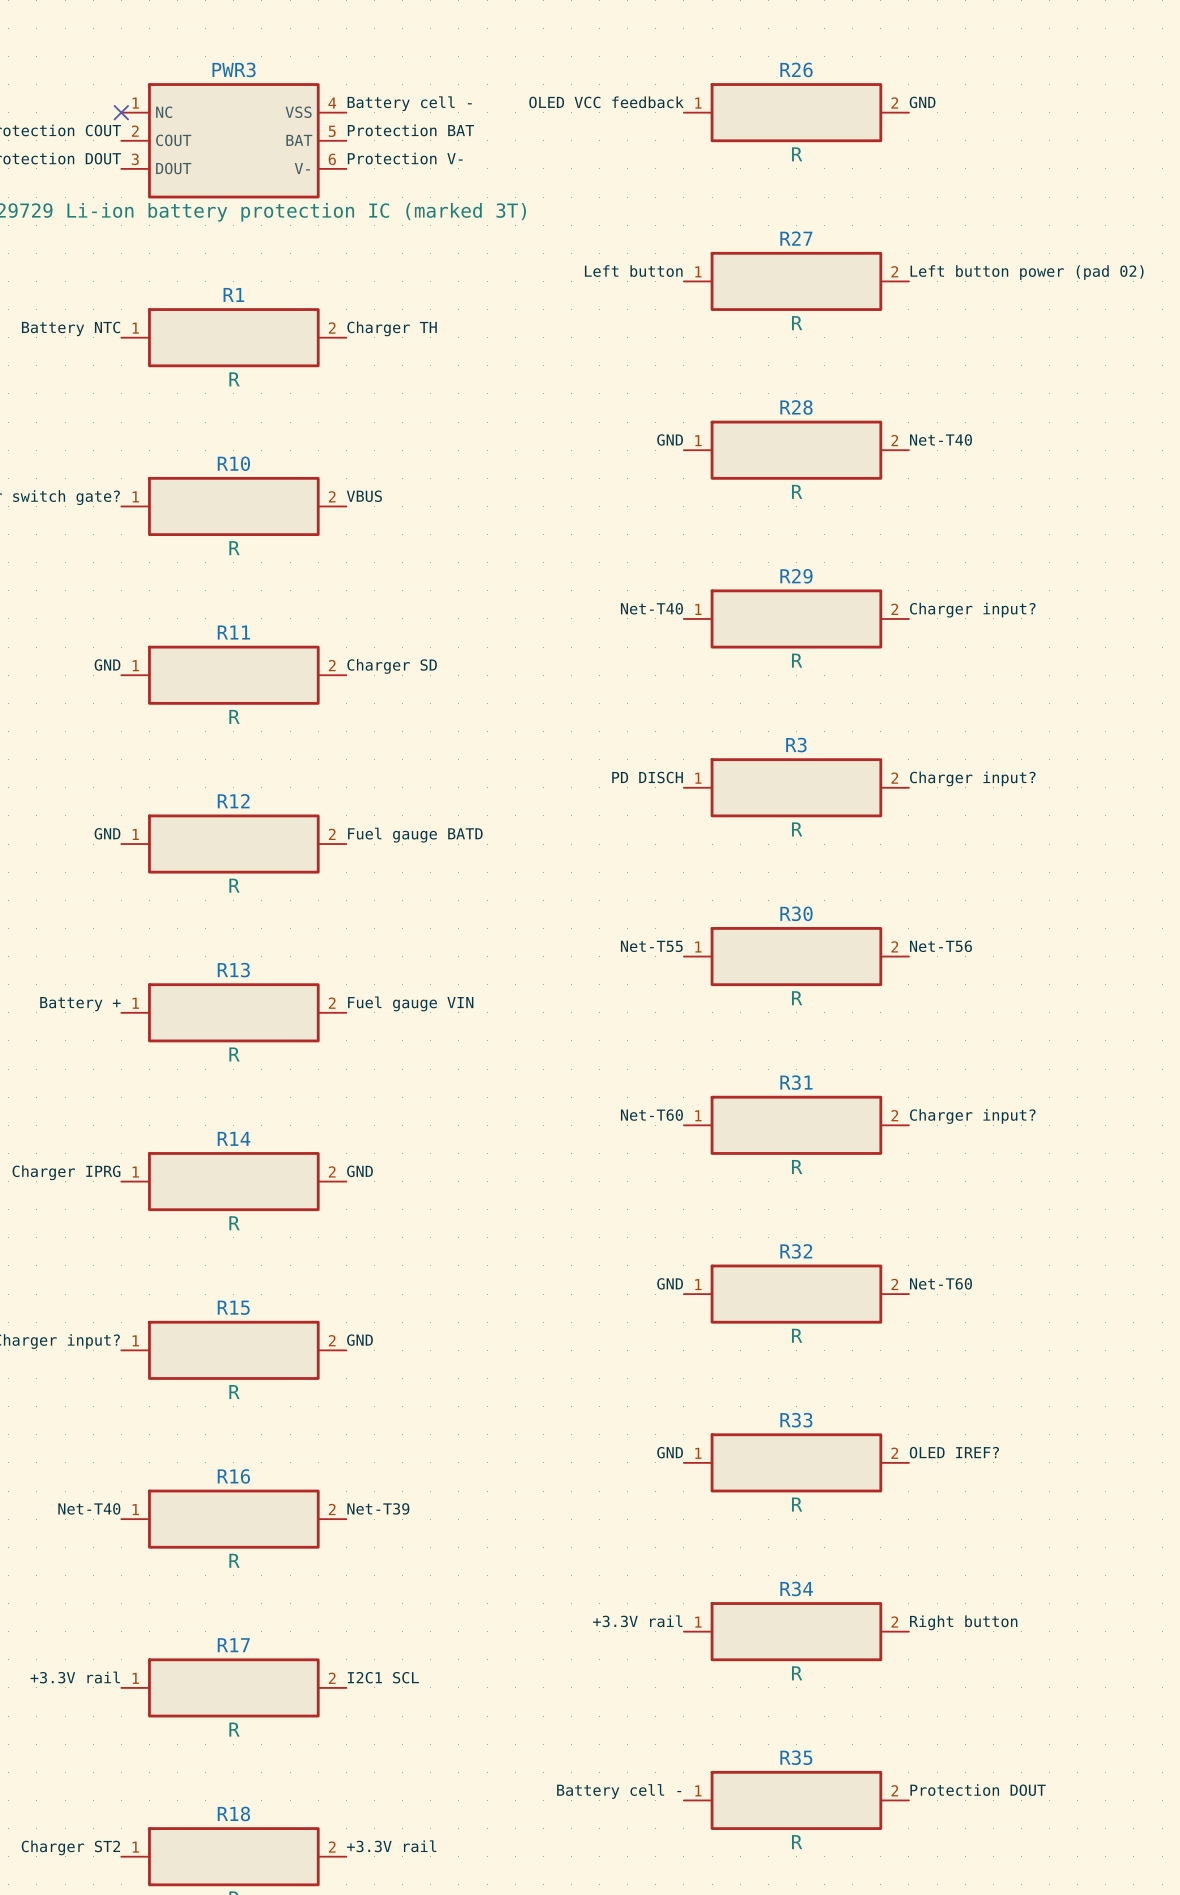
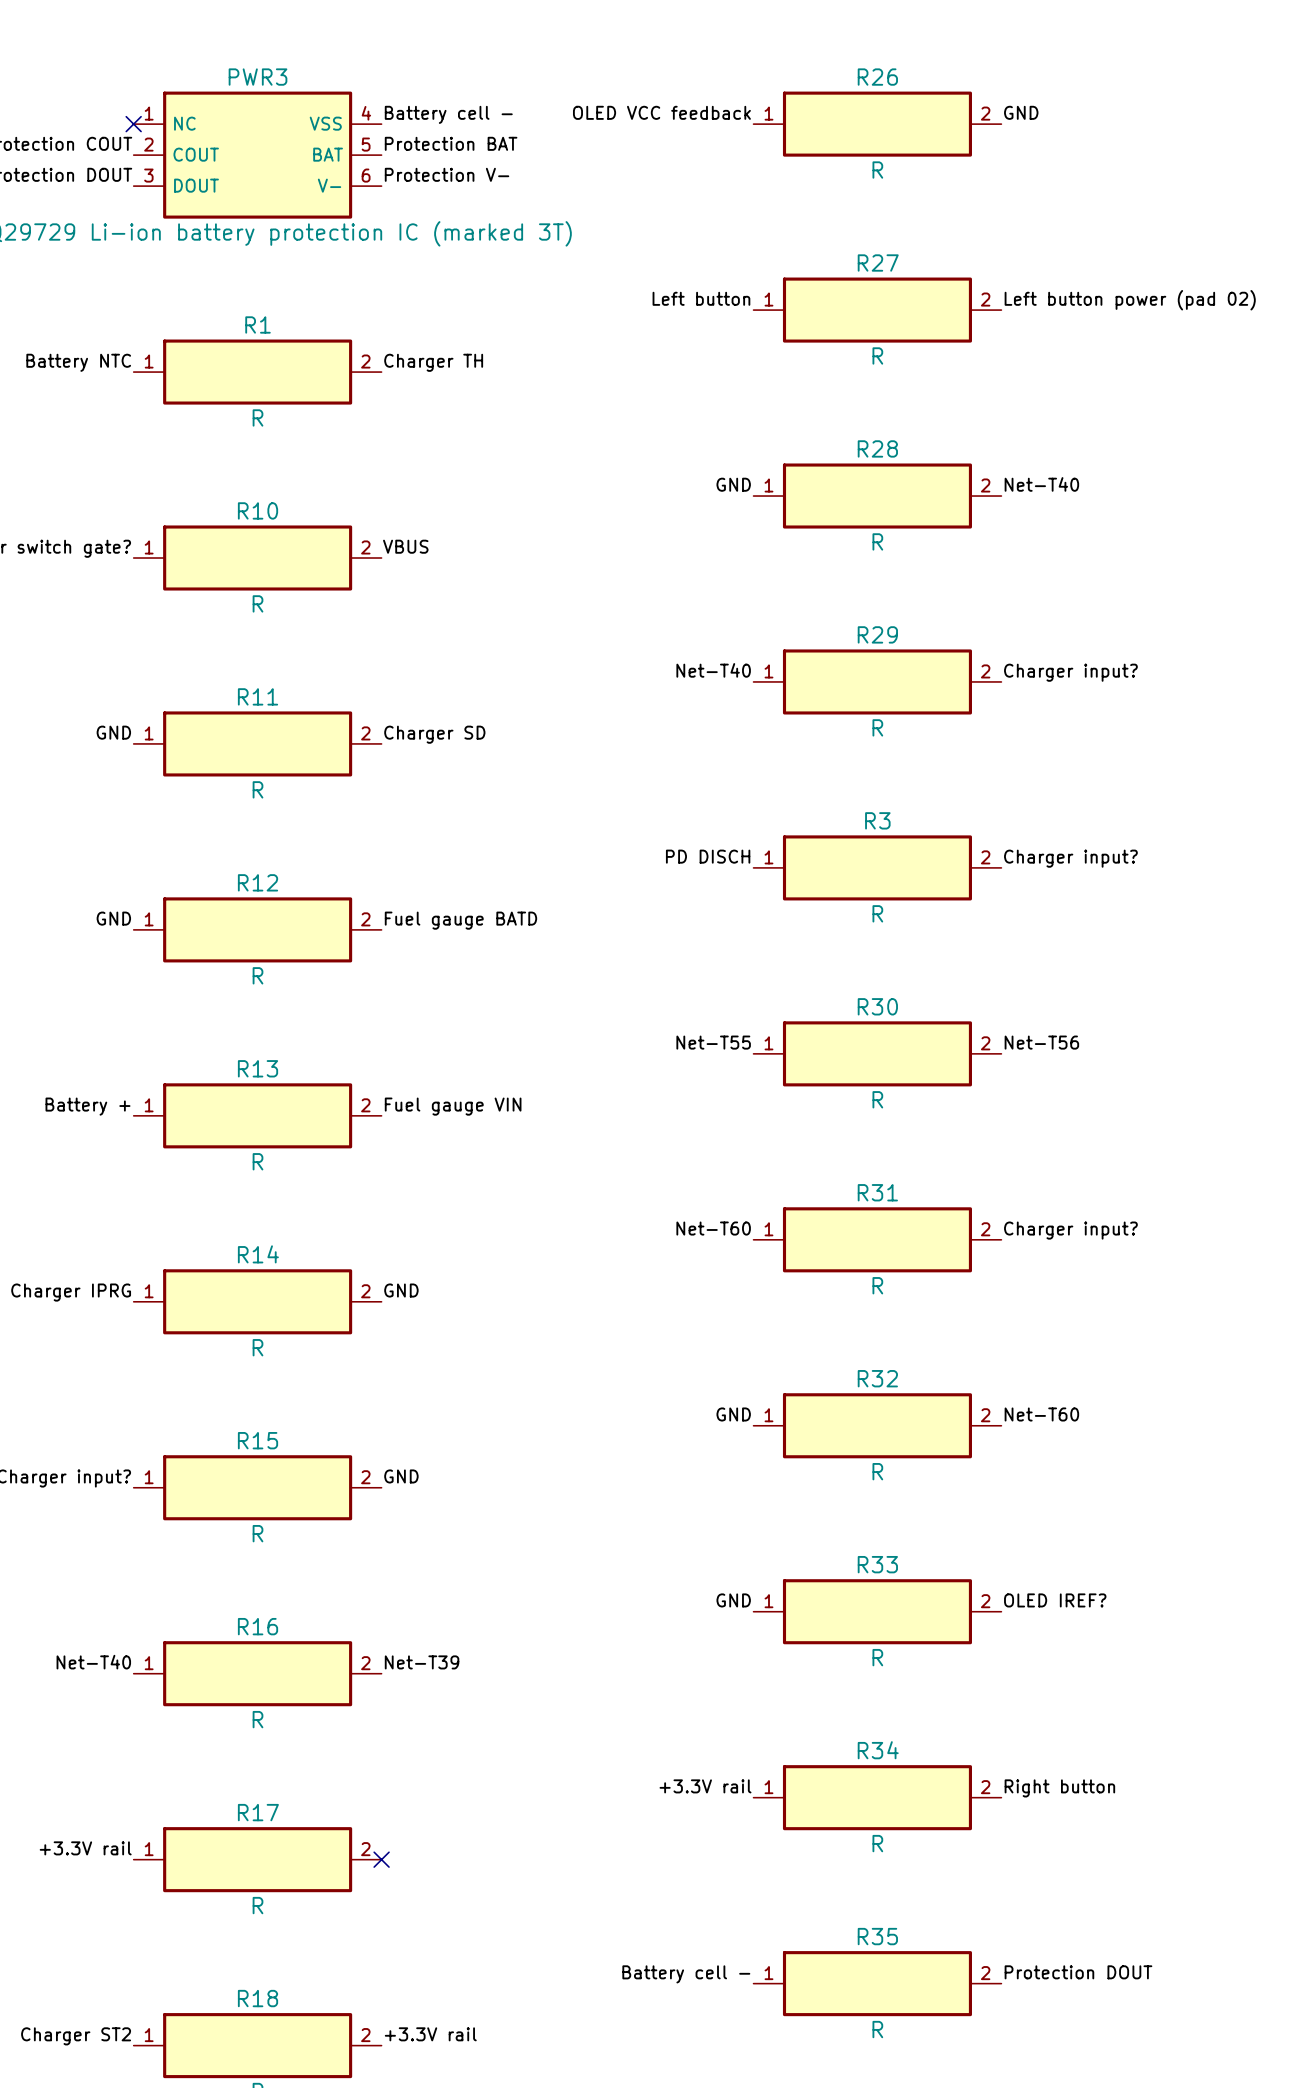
label: I2C1 SCL (383, 1677) -> none
no-connect mark: none -> (381, 1859)

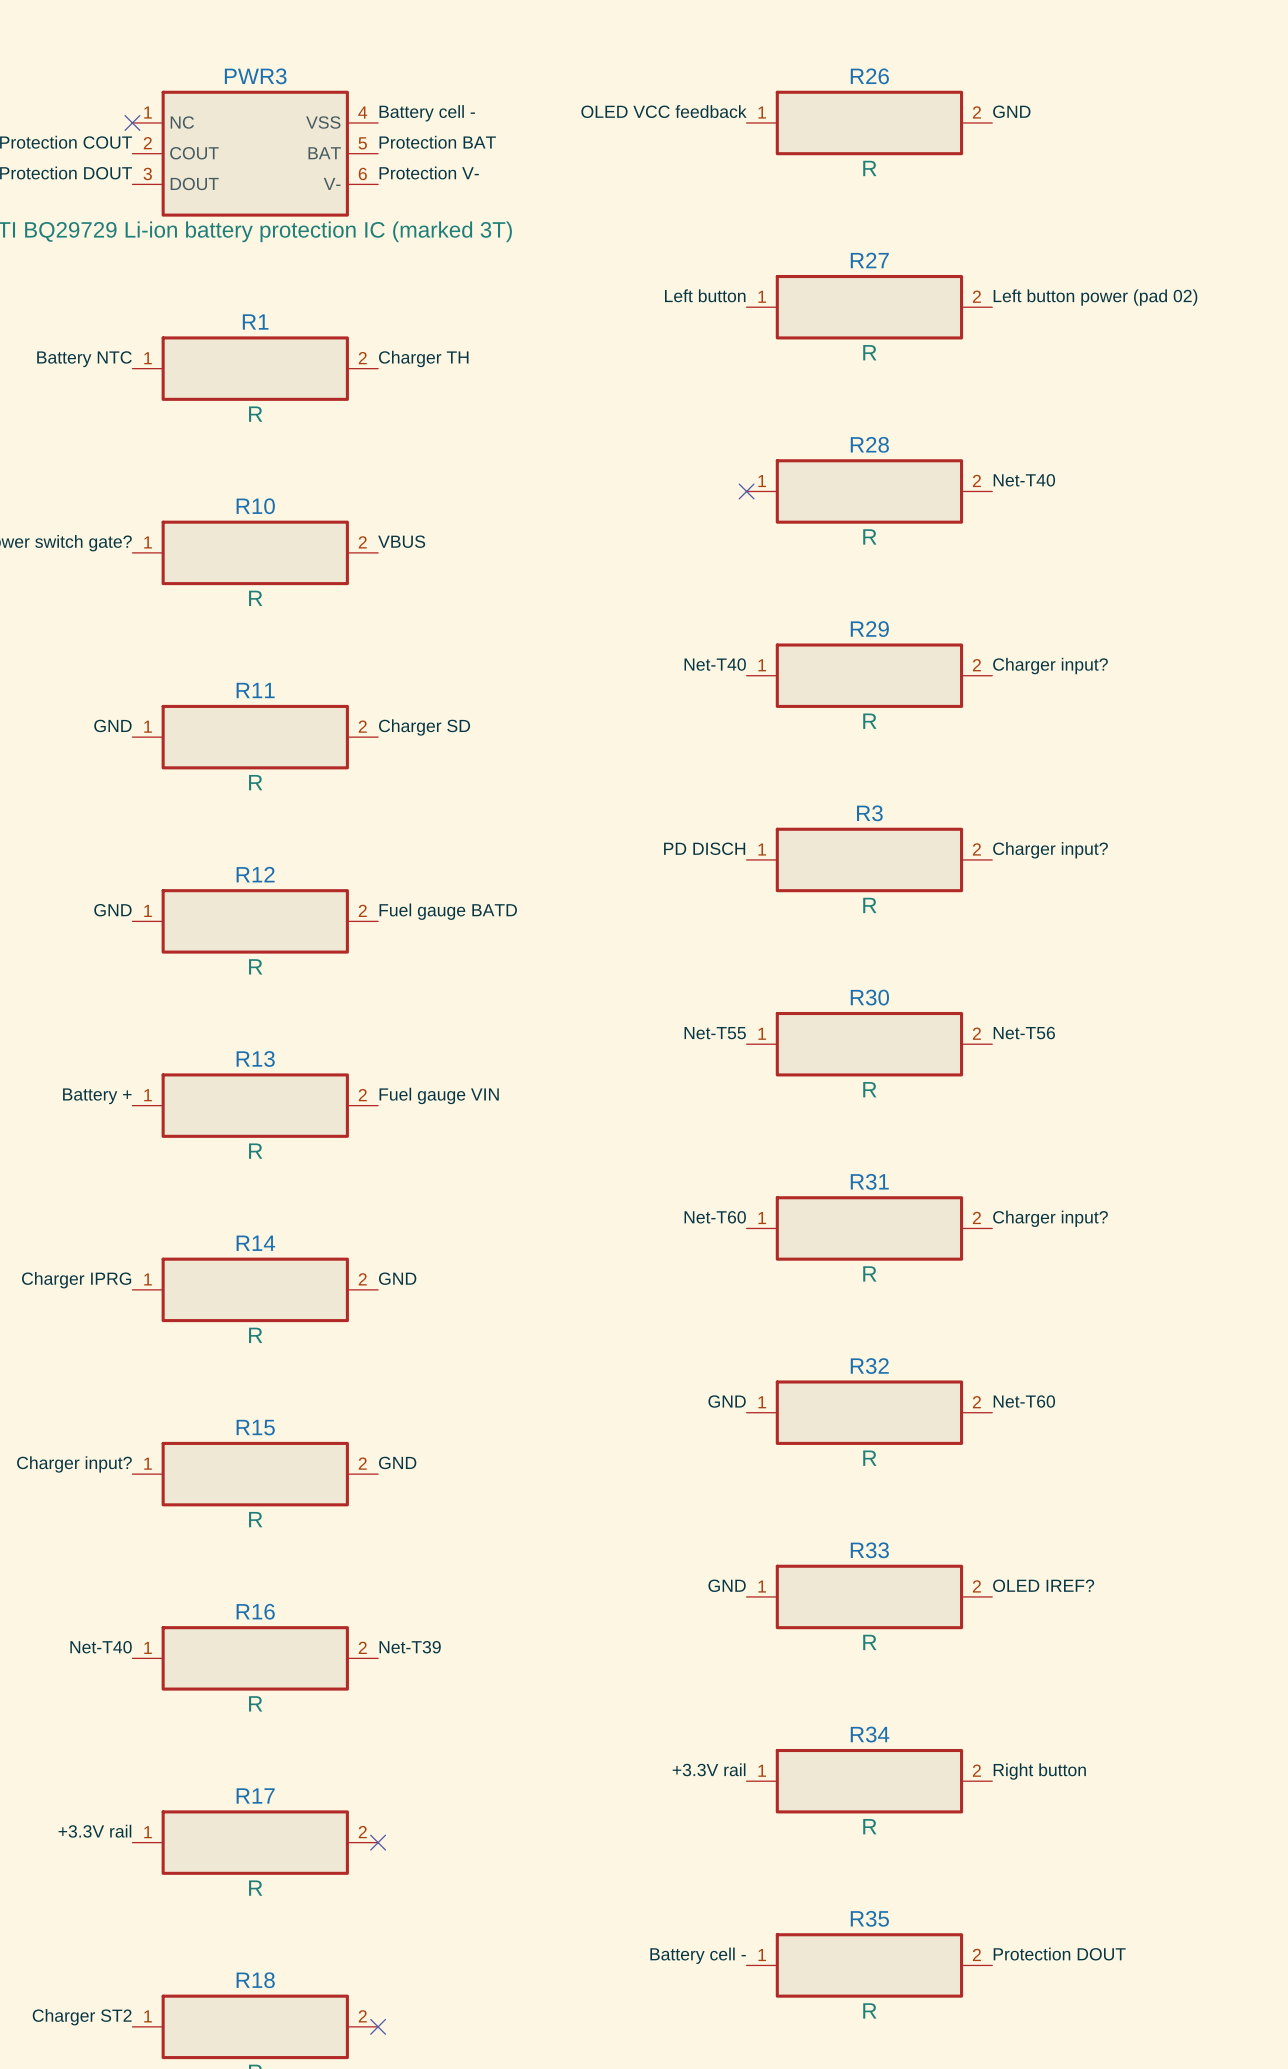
label: GND (733, 484) -> none
no-connect mark: none -> (746, 491)
label: +3.3V rail (430, 2034) -> none
no-connect mark: none -> (378, 2026)

